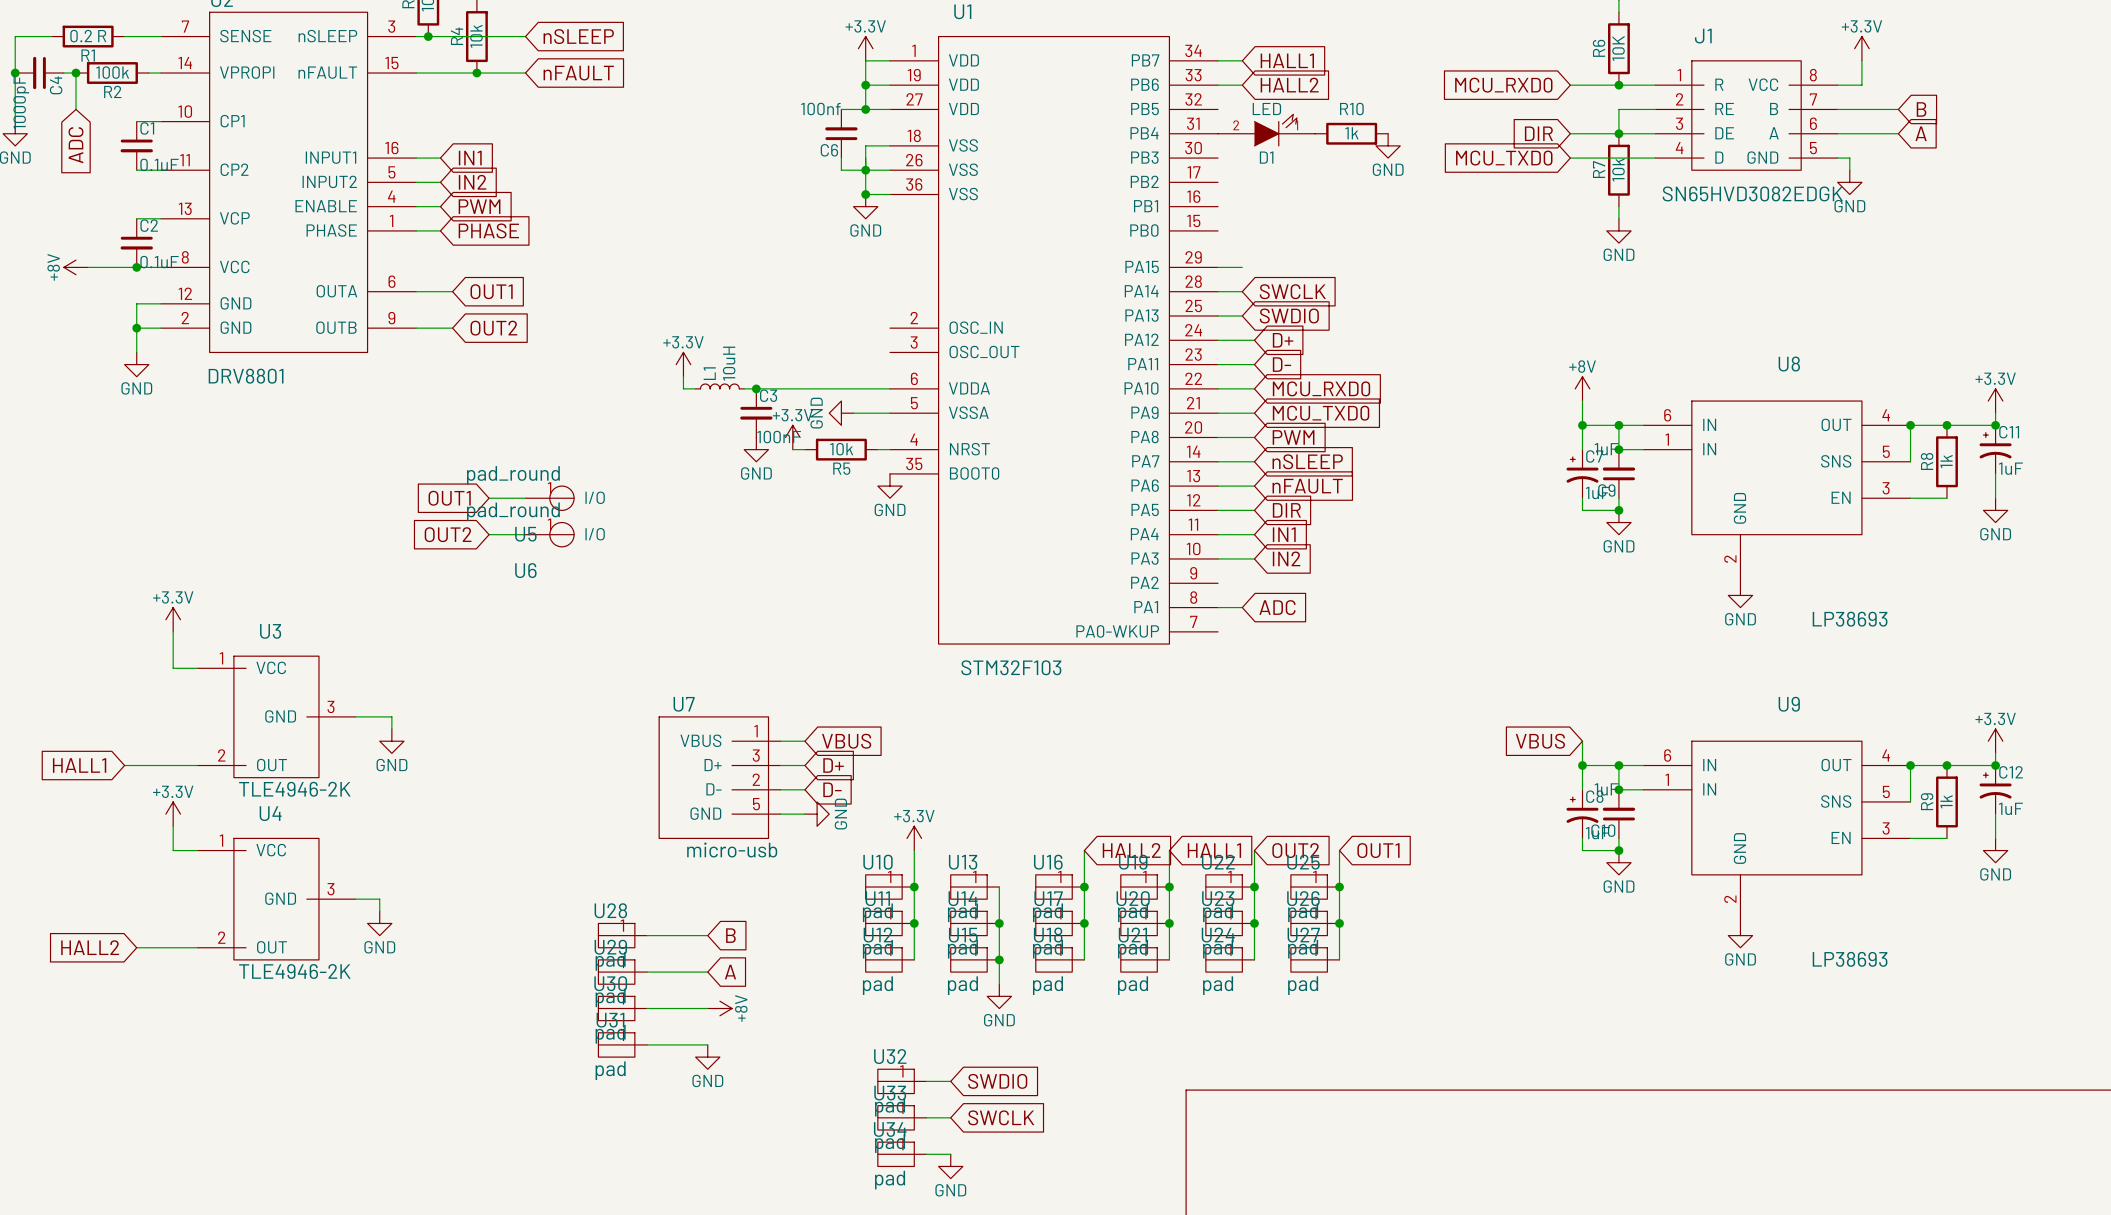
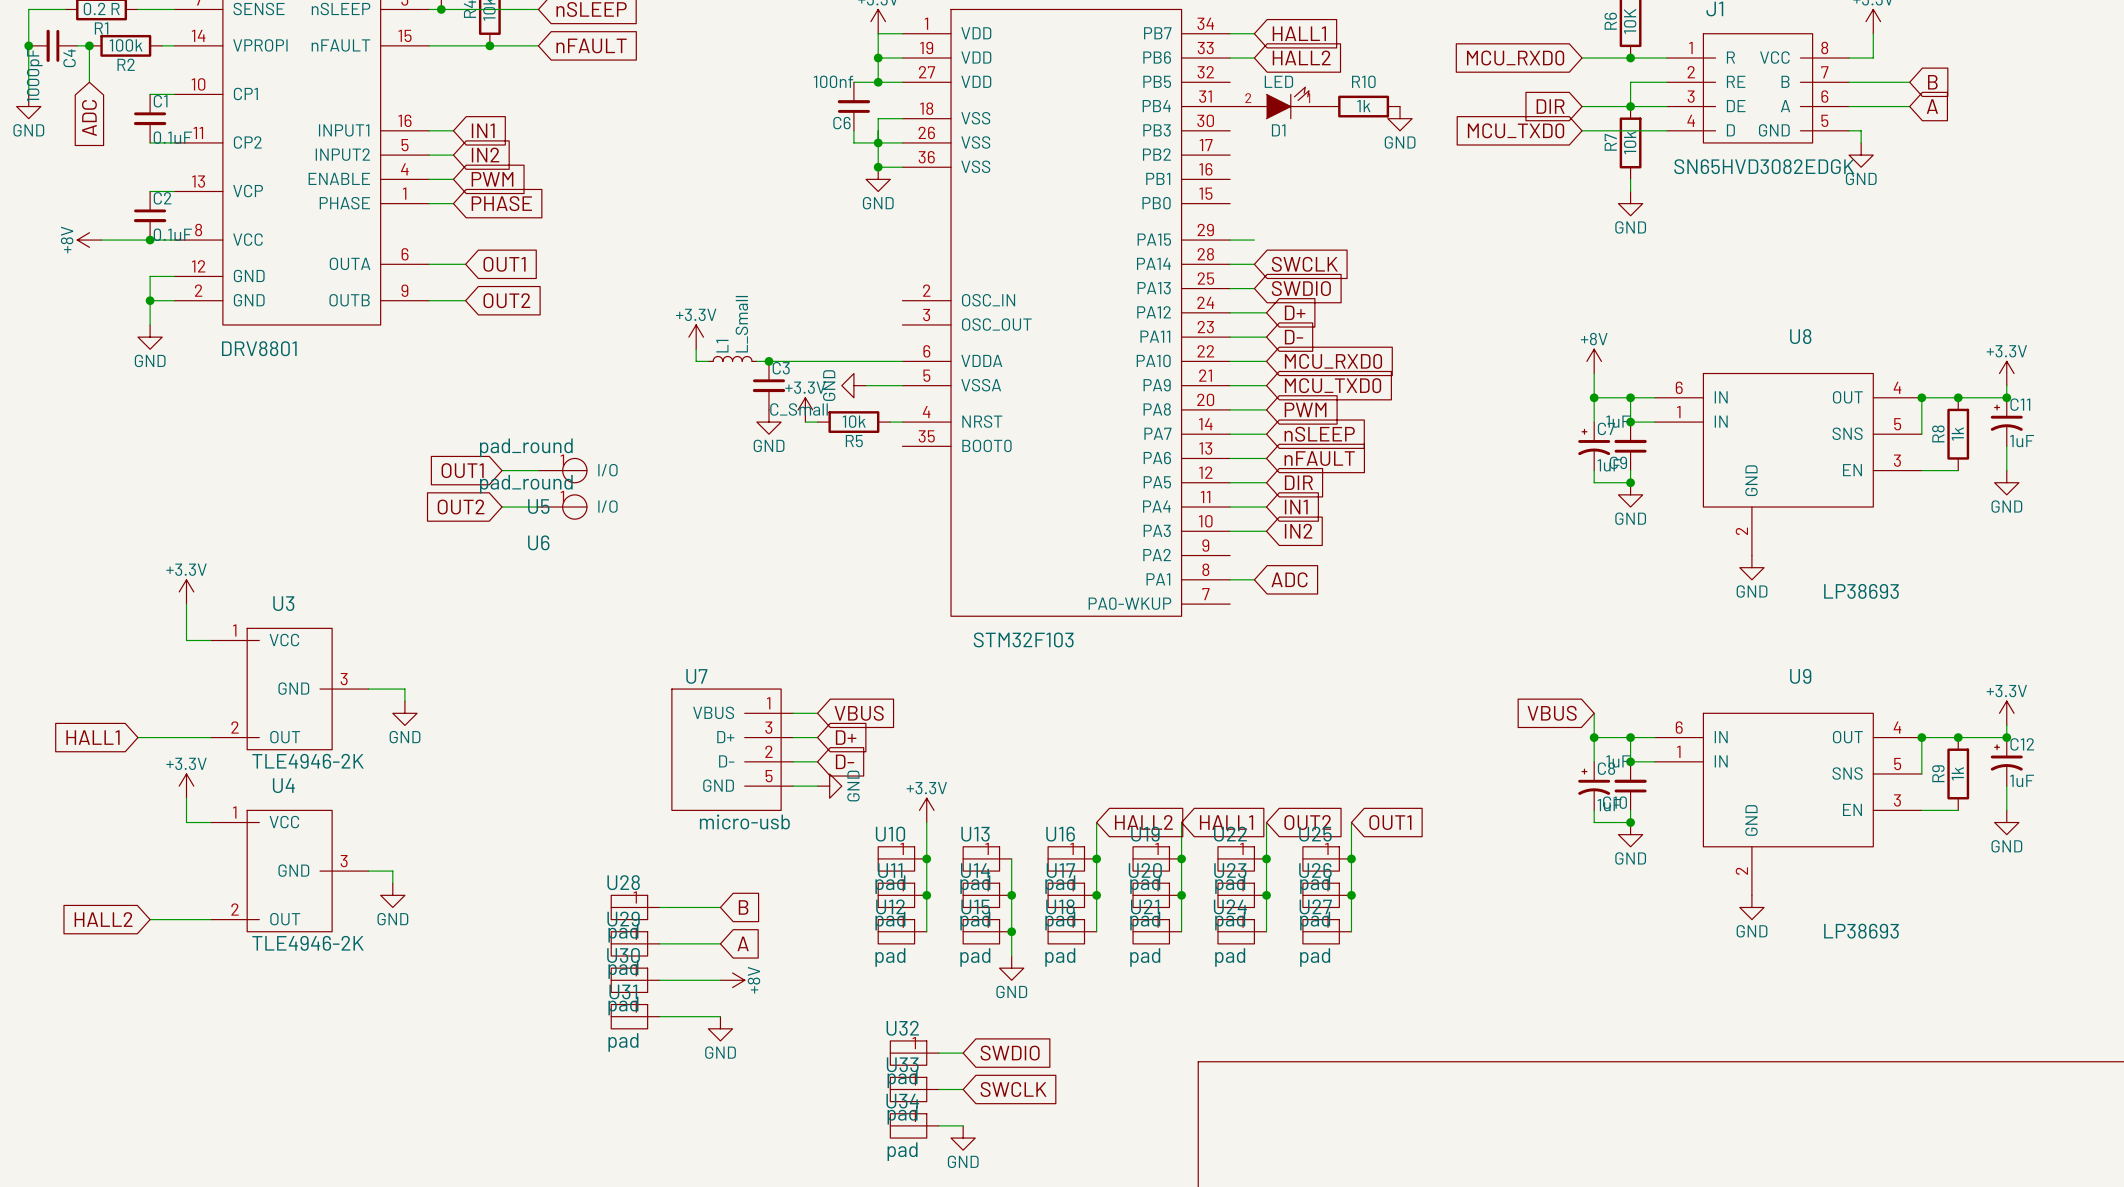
L1 value: 10uH (729, 363) -> L_Small (741, 324)
C3 value: 100nF (779, 437) -> C_Small (799, 409)
power symbol: GND (889, 486) -> none

